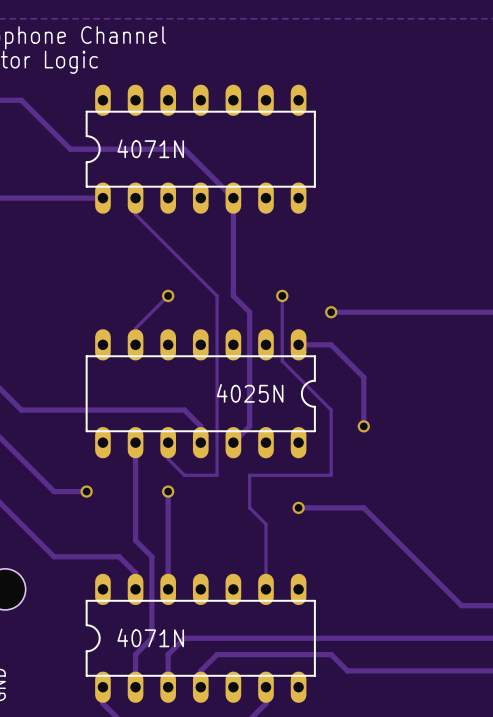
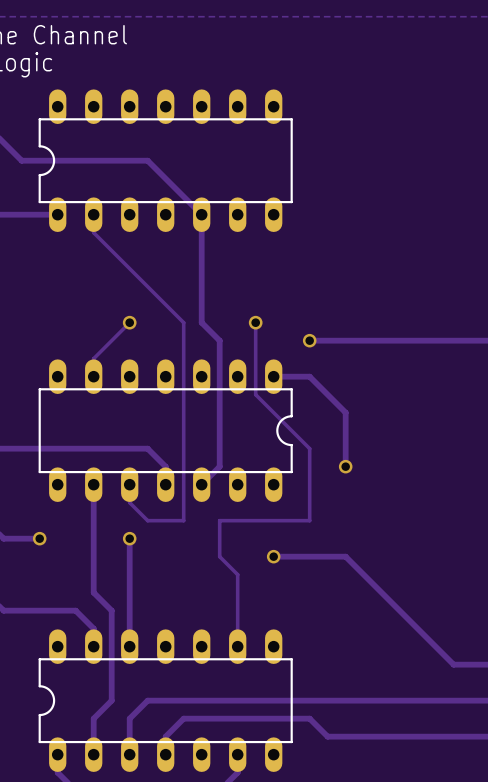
part value: 4071N (150, 148) -> none
part value: 4025N (250, 393) -> none
part value: 4071N (150, 637) -> none

